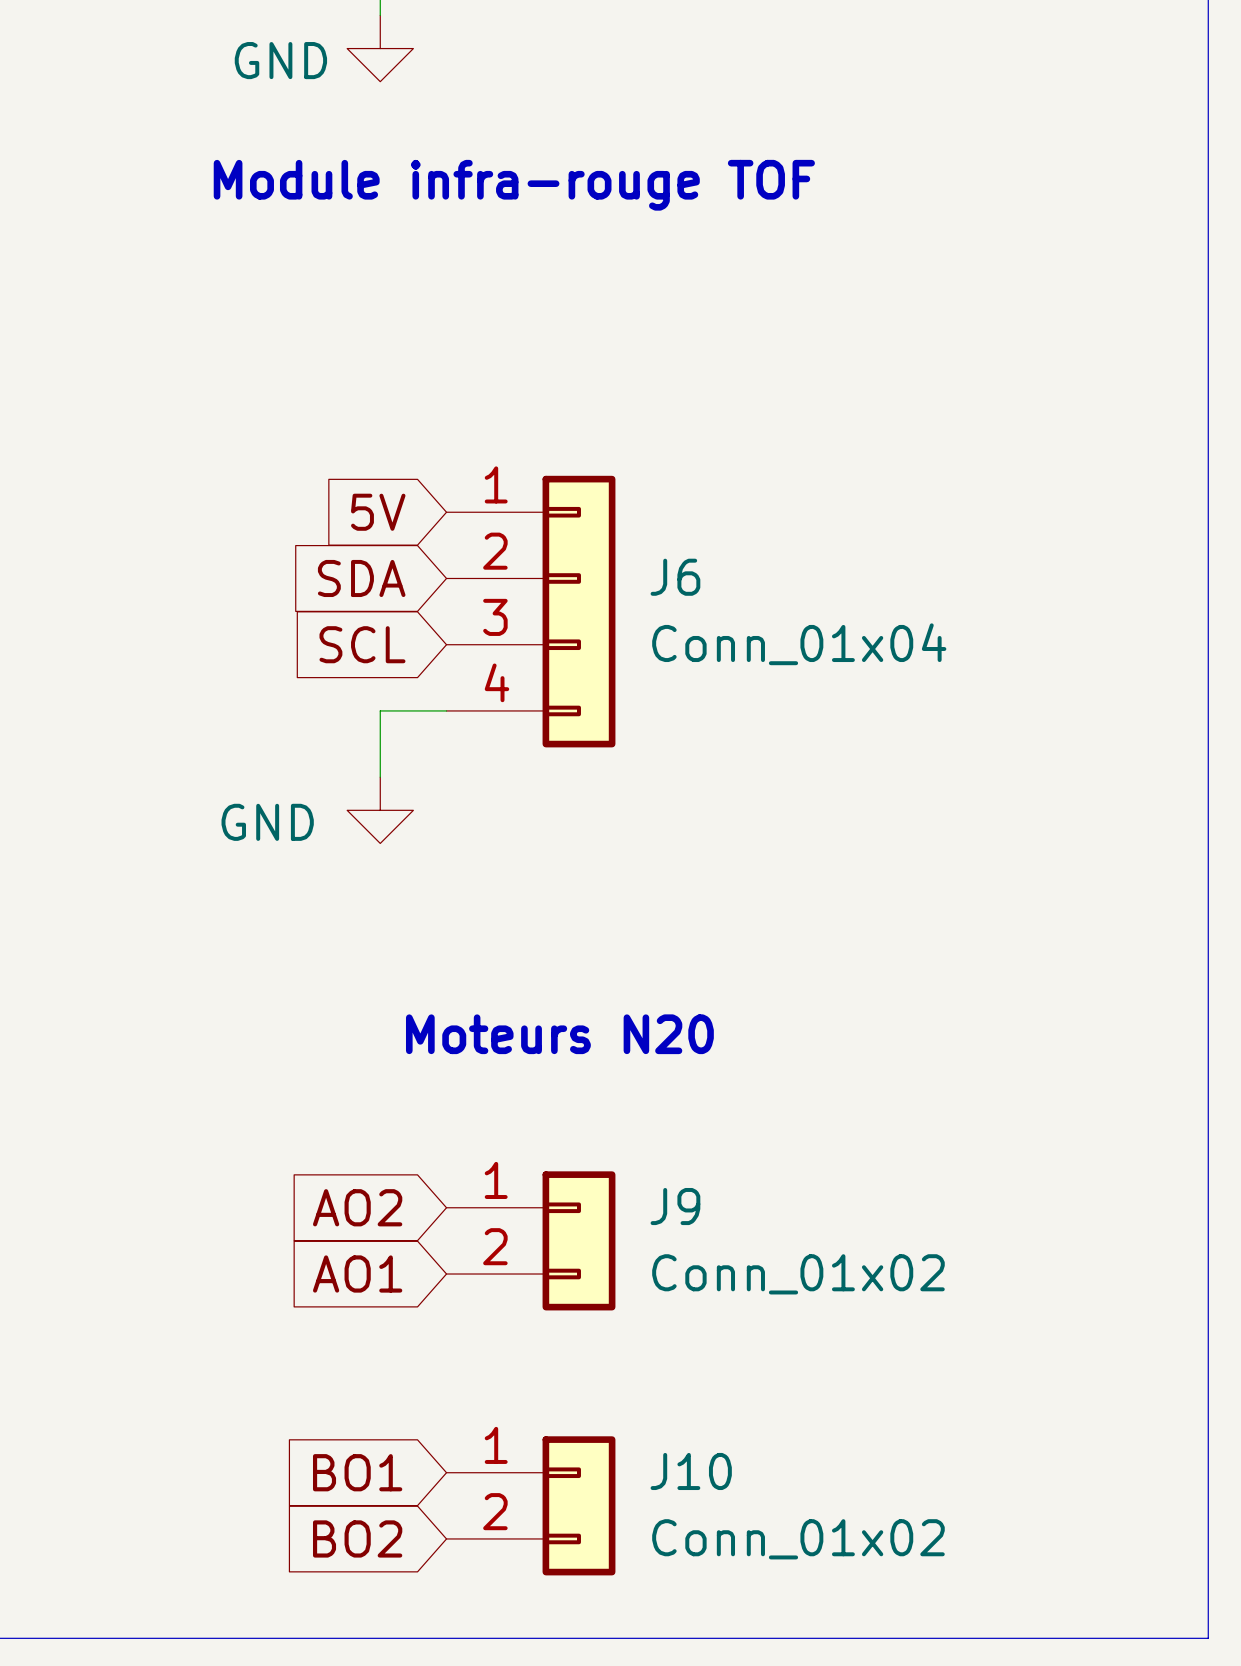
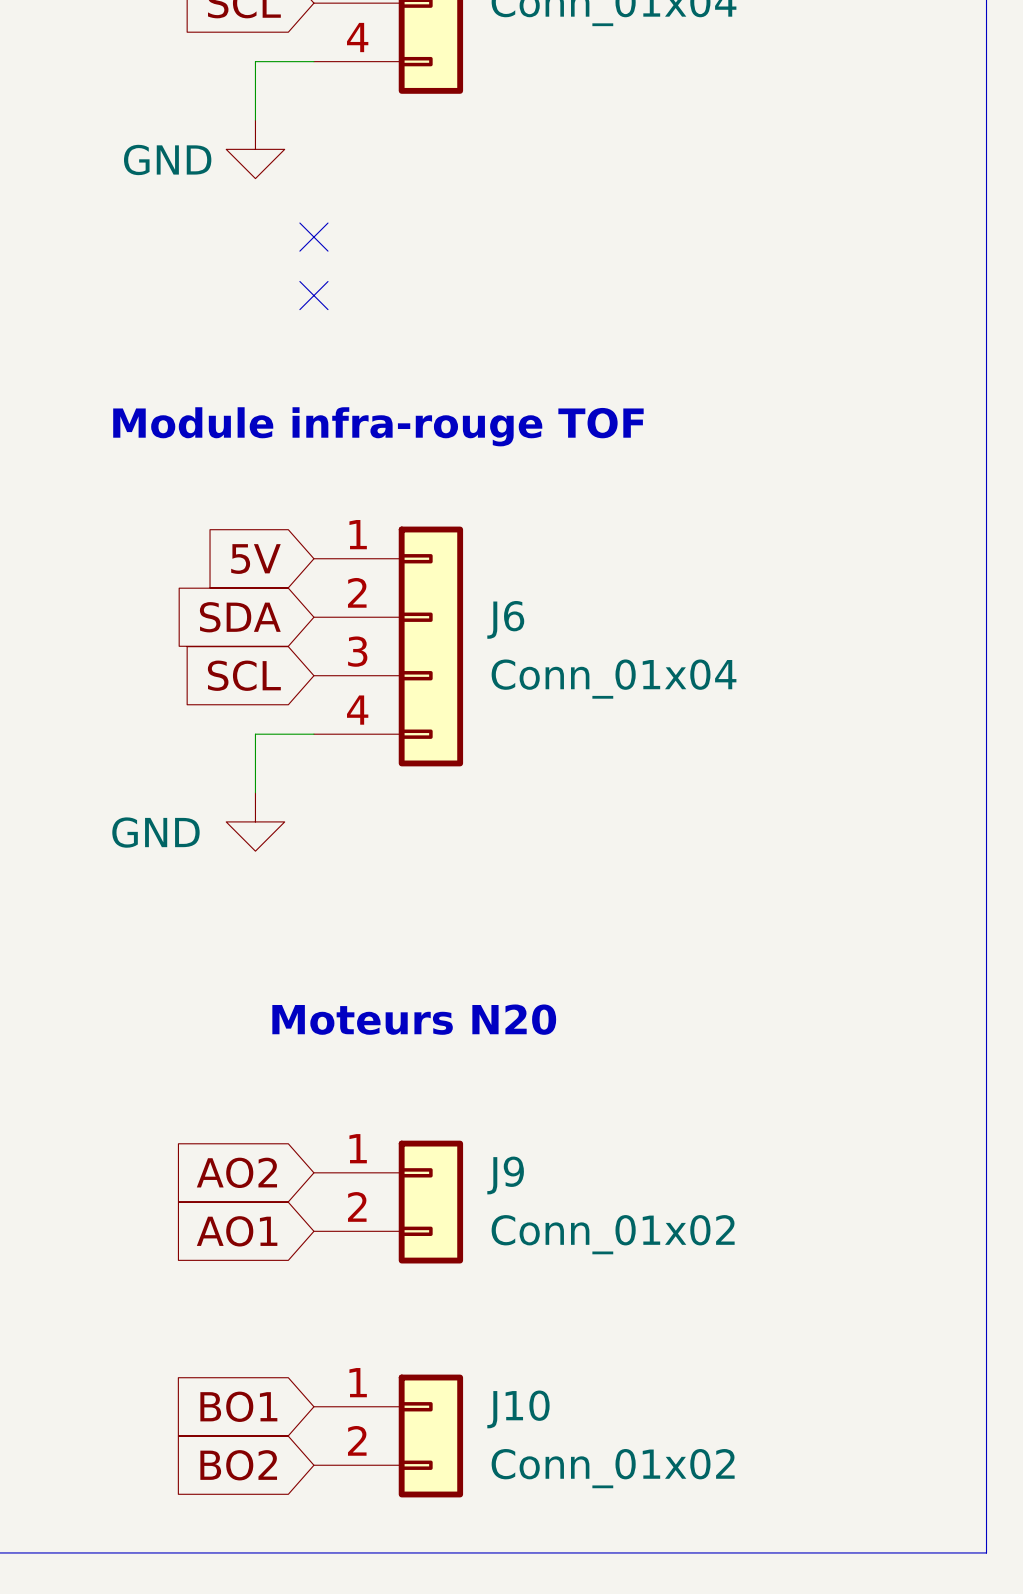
no-connect mark: none -> (313, 237)
text position: Module infra-rouge TOF (514, 185) -> Module infra-rouge TOF (378, 426)
no-connect mark: none -> (313, 295)

